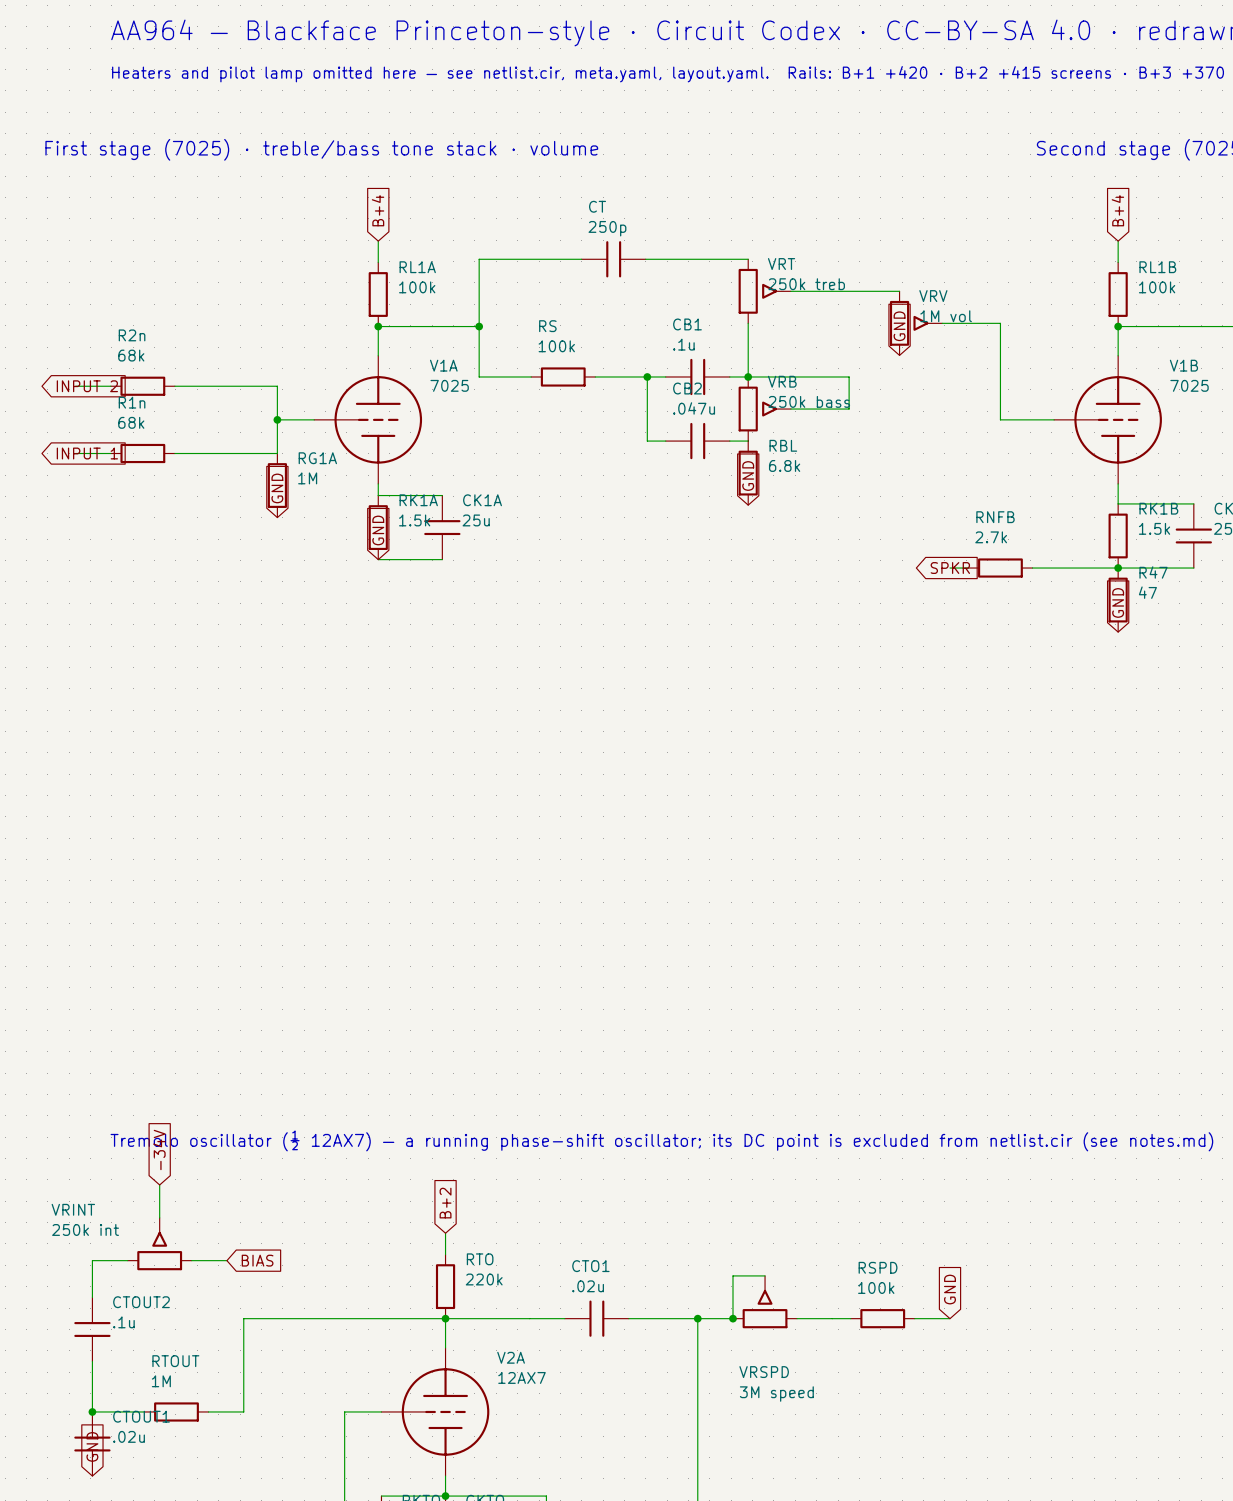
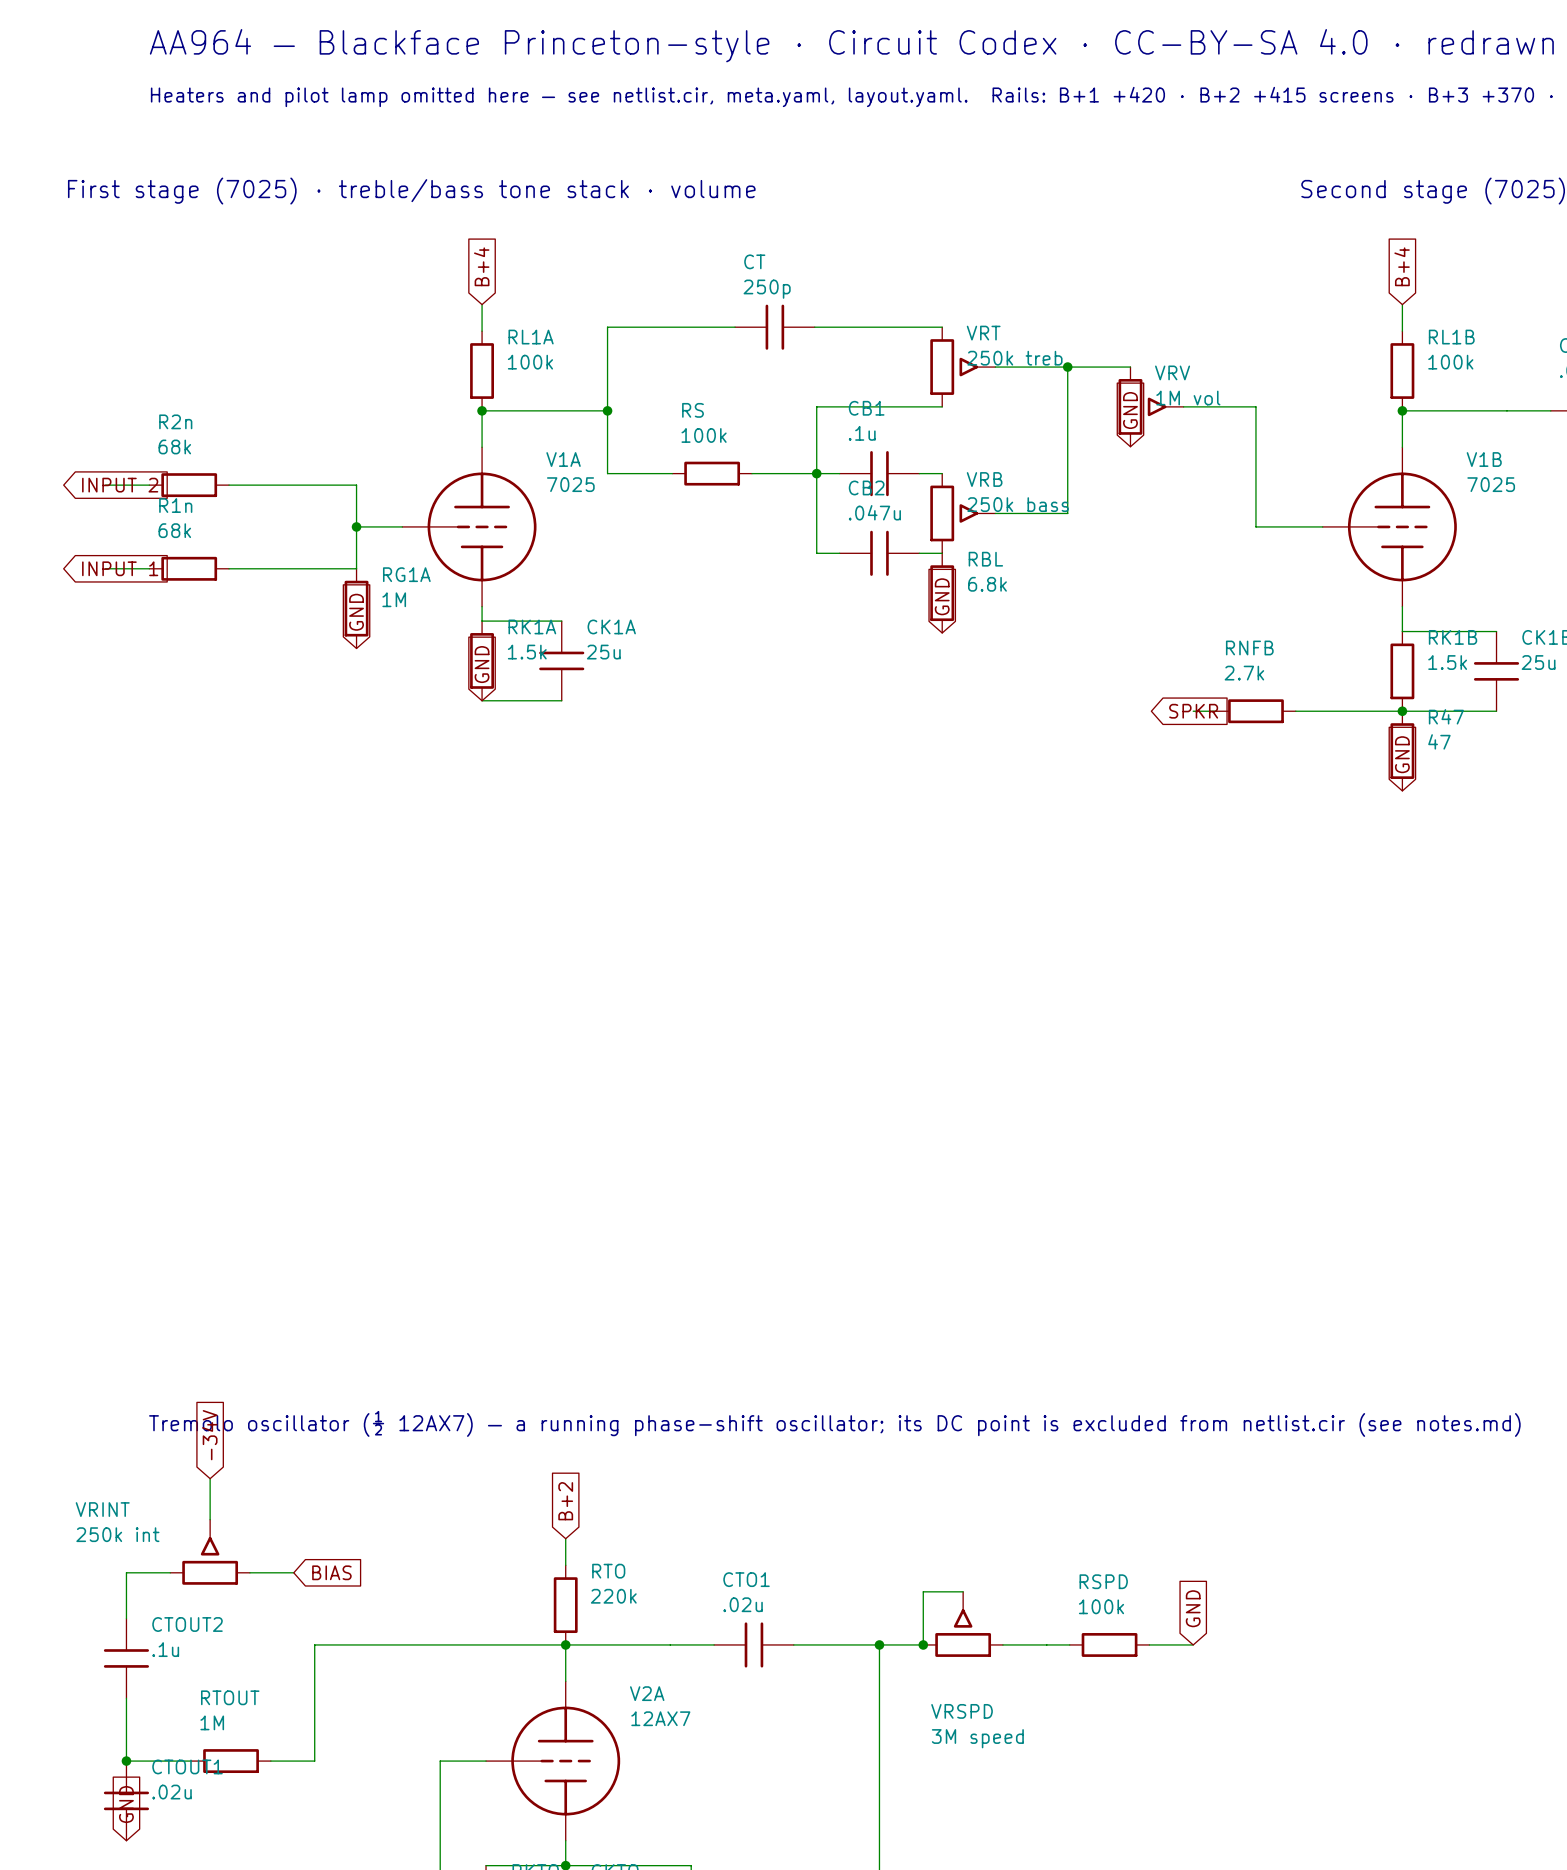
junction: none -> (1067, 367)
wire: (748, 323) (748, 376) (849, 376) -> (1067, 367) (1067, 473)
wire: none -> (942, 406) (816, 406) (816, 473)
junction: (748, 376) -> none

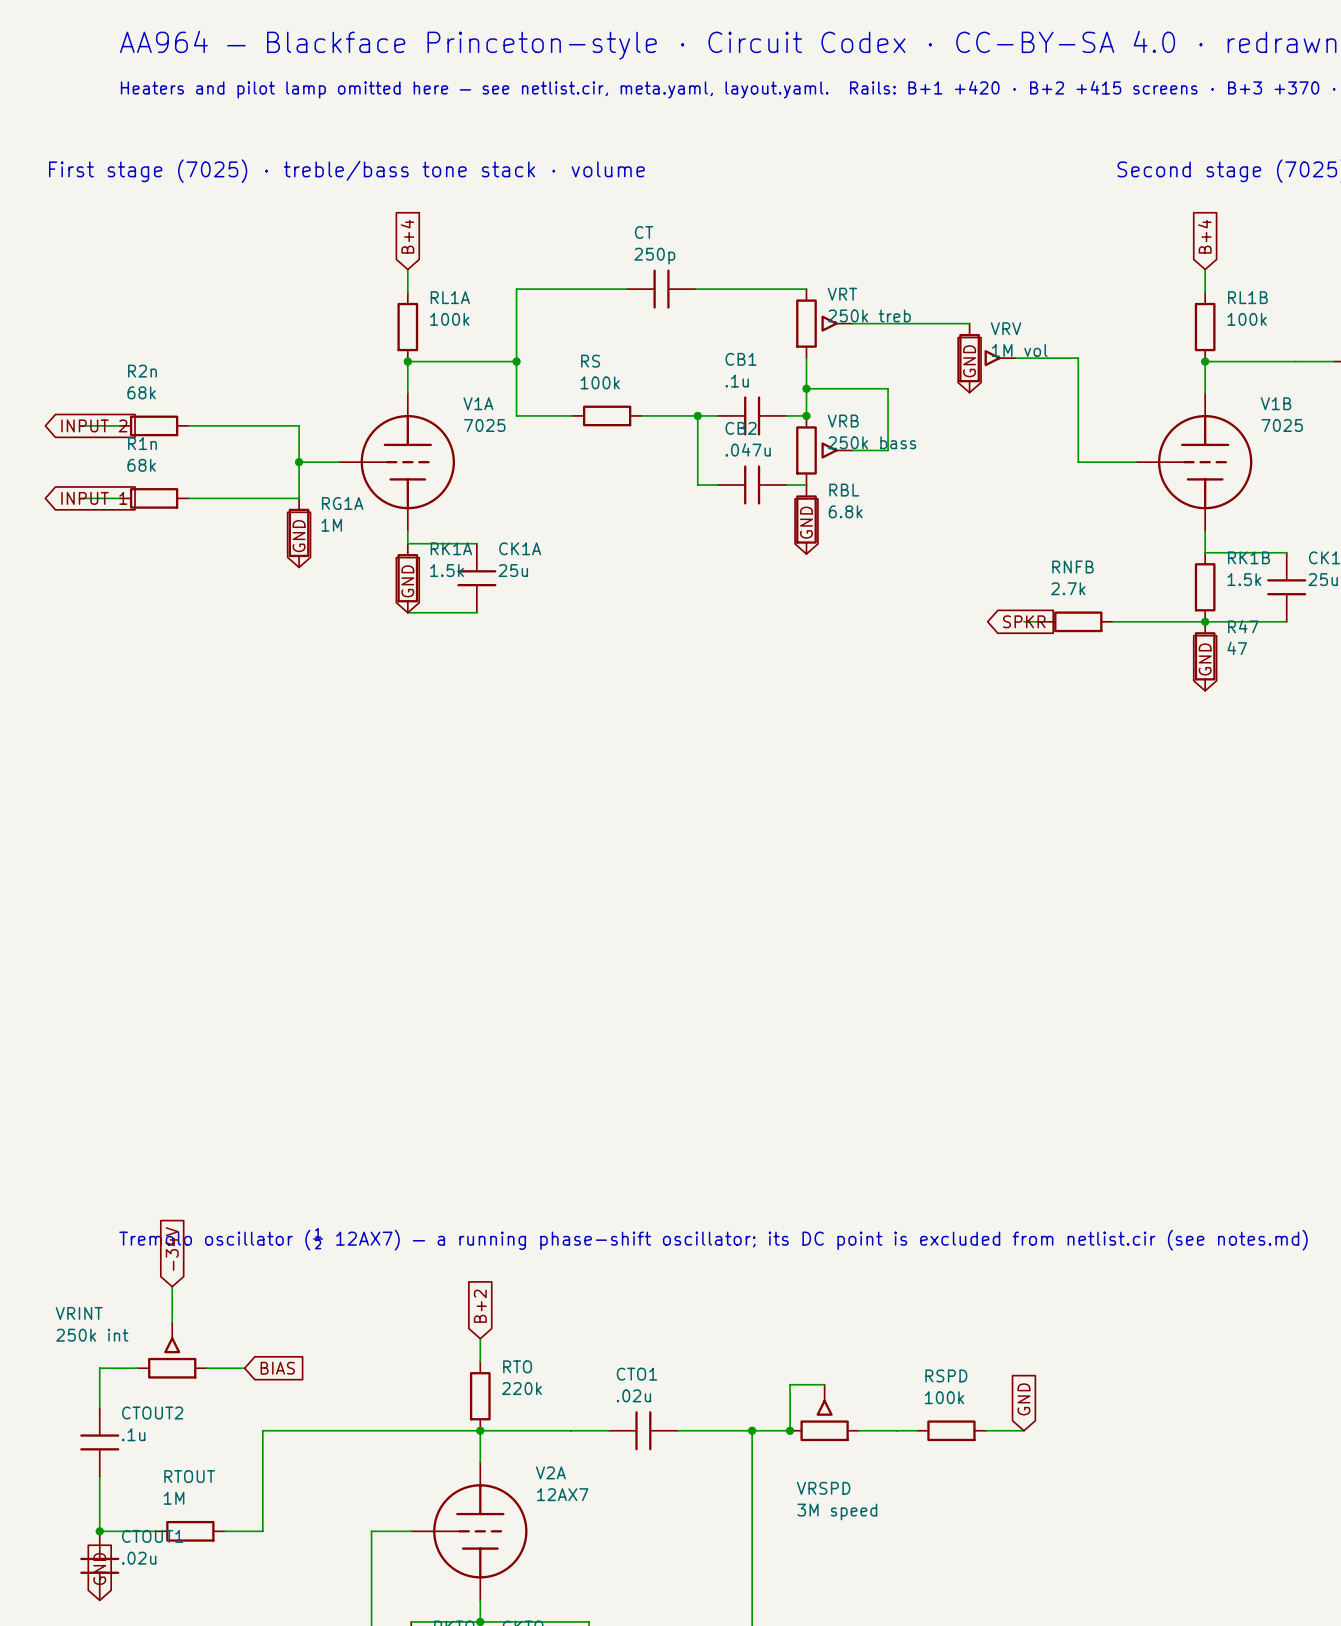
wire: (1067, 367) (1067, 513) (1036, 513) -> (806, 388) (888, 388) (888, 450)
junction: (1067, 367) -> none
wire: (942, 406) (816, 406) (816, 473) -> (806, 358) (806, 415)
junction: none -> (806, 388)
junction: none -> (806, 415)

